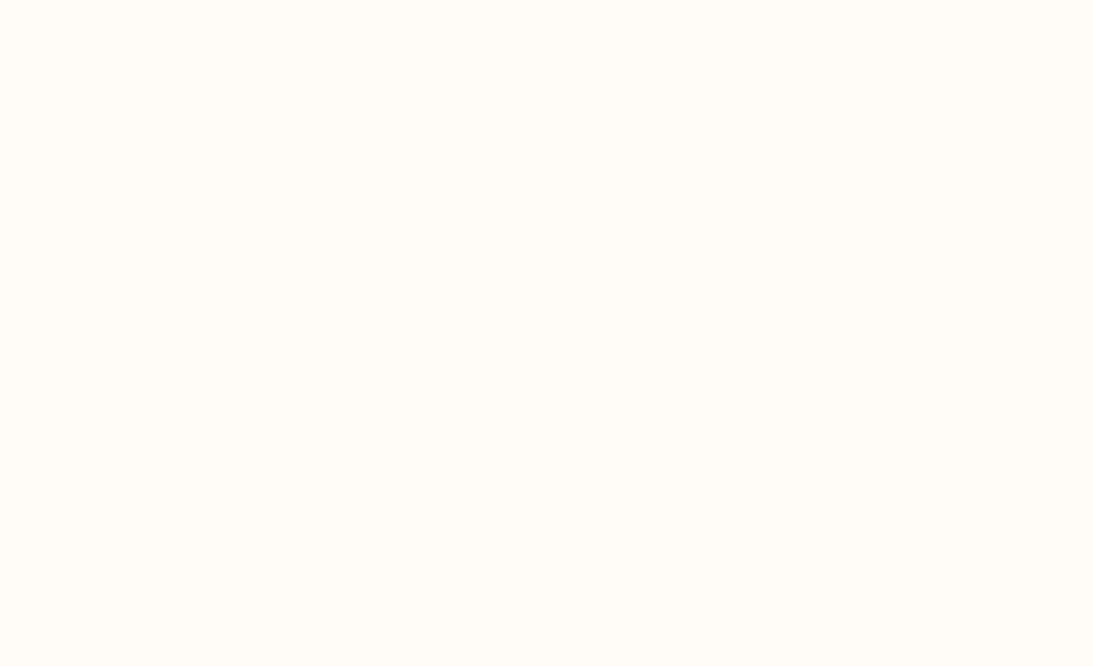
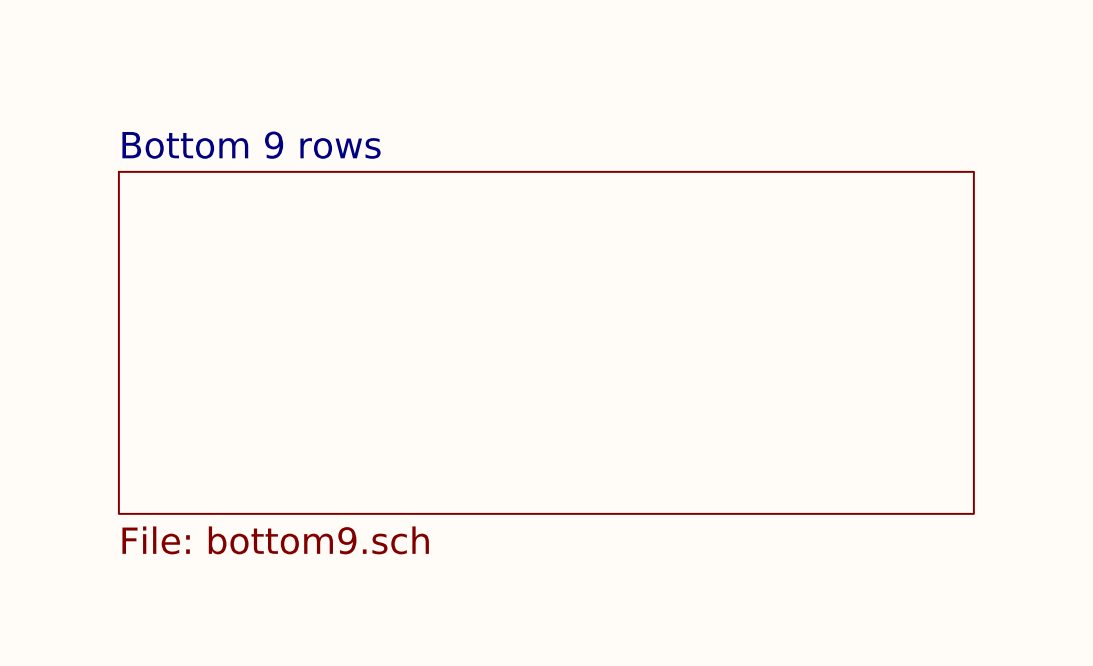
sheet Bottom 9 rows: none -> File: bottom9.sch (546, 342)

